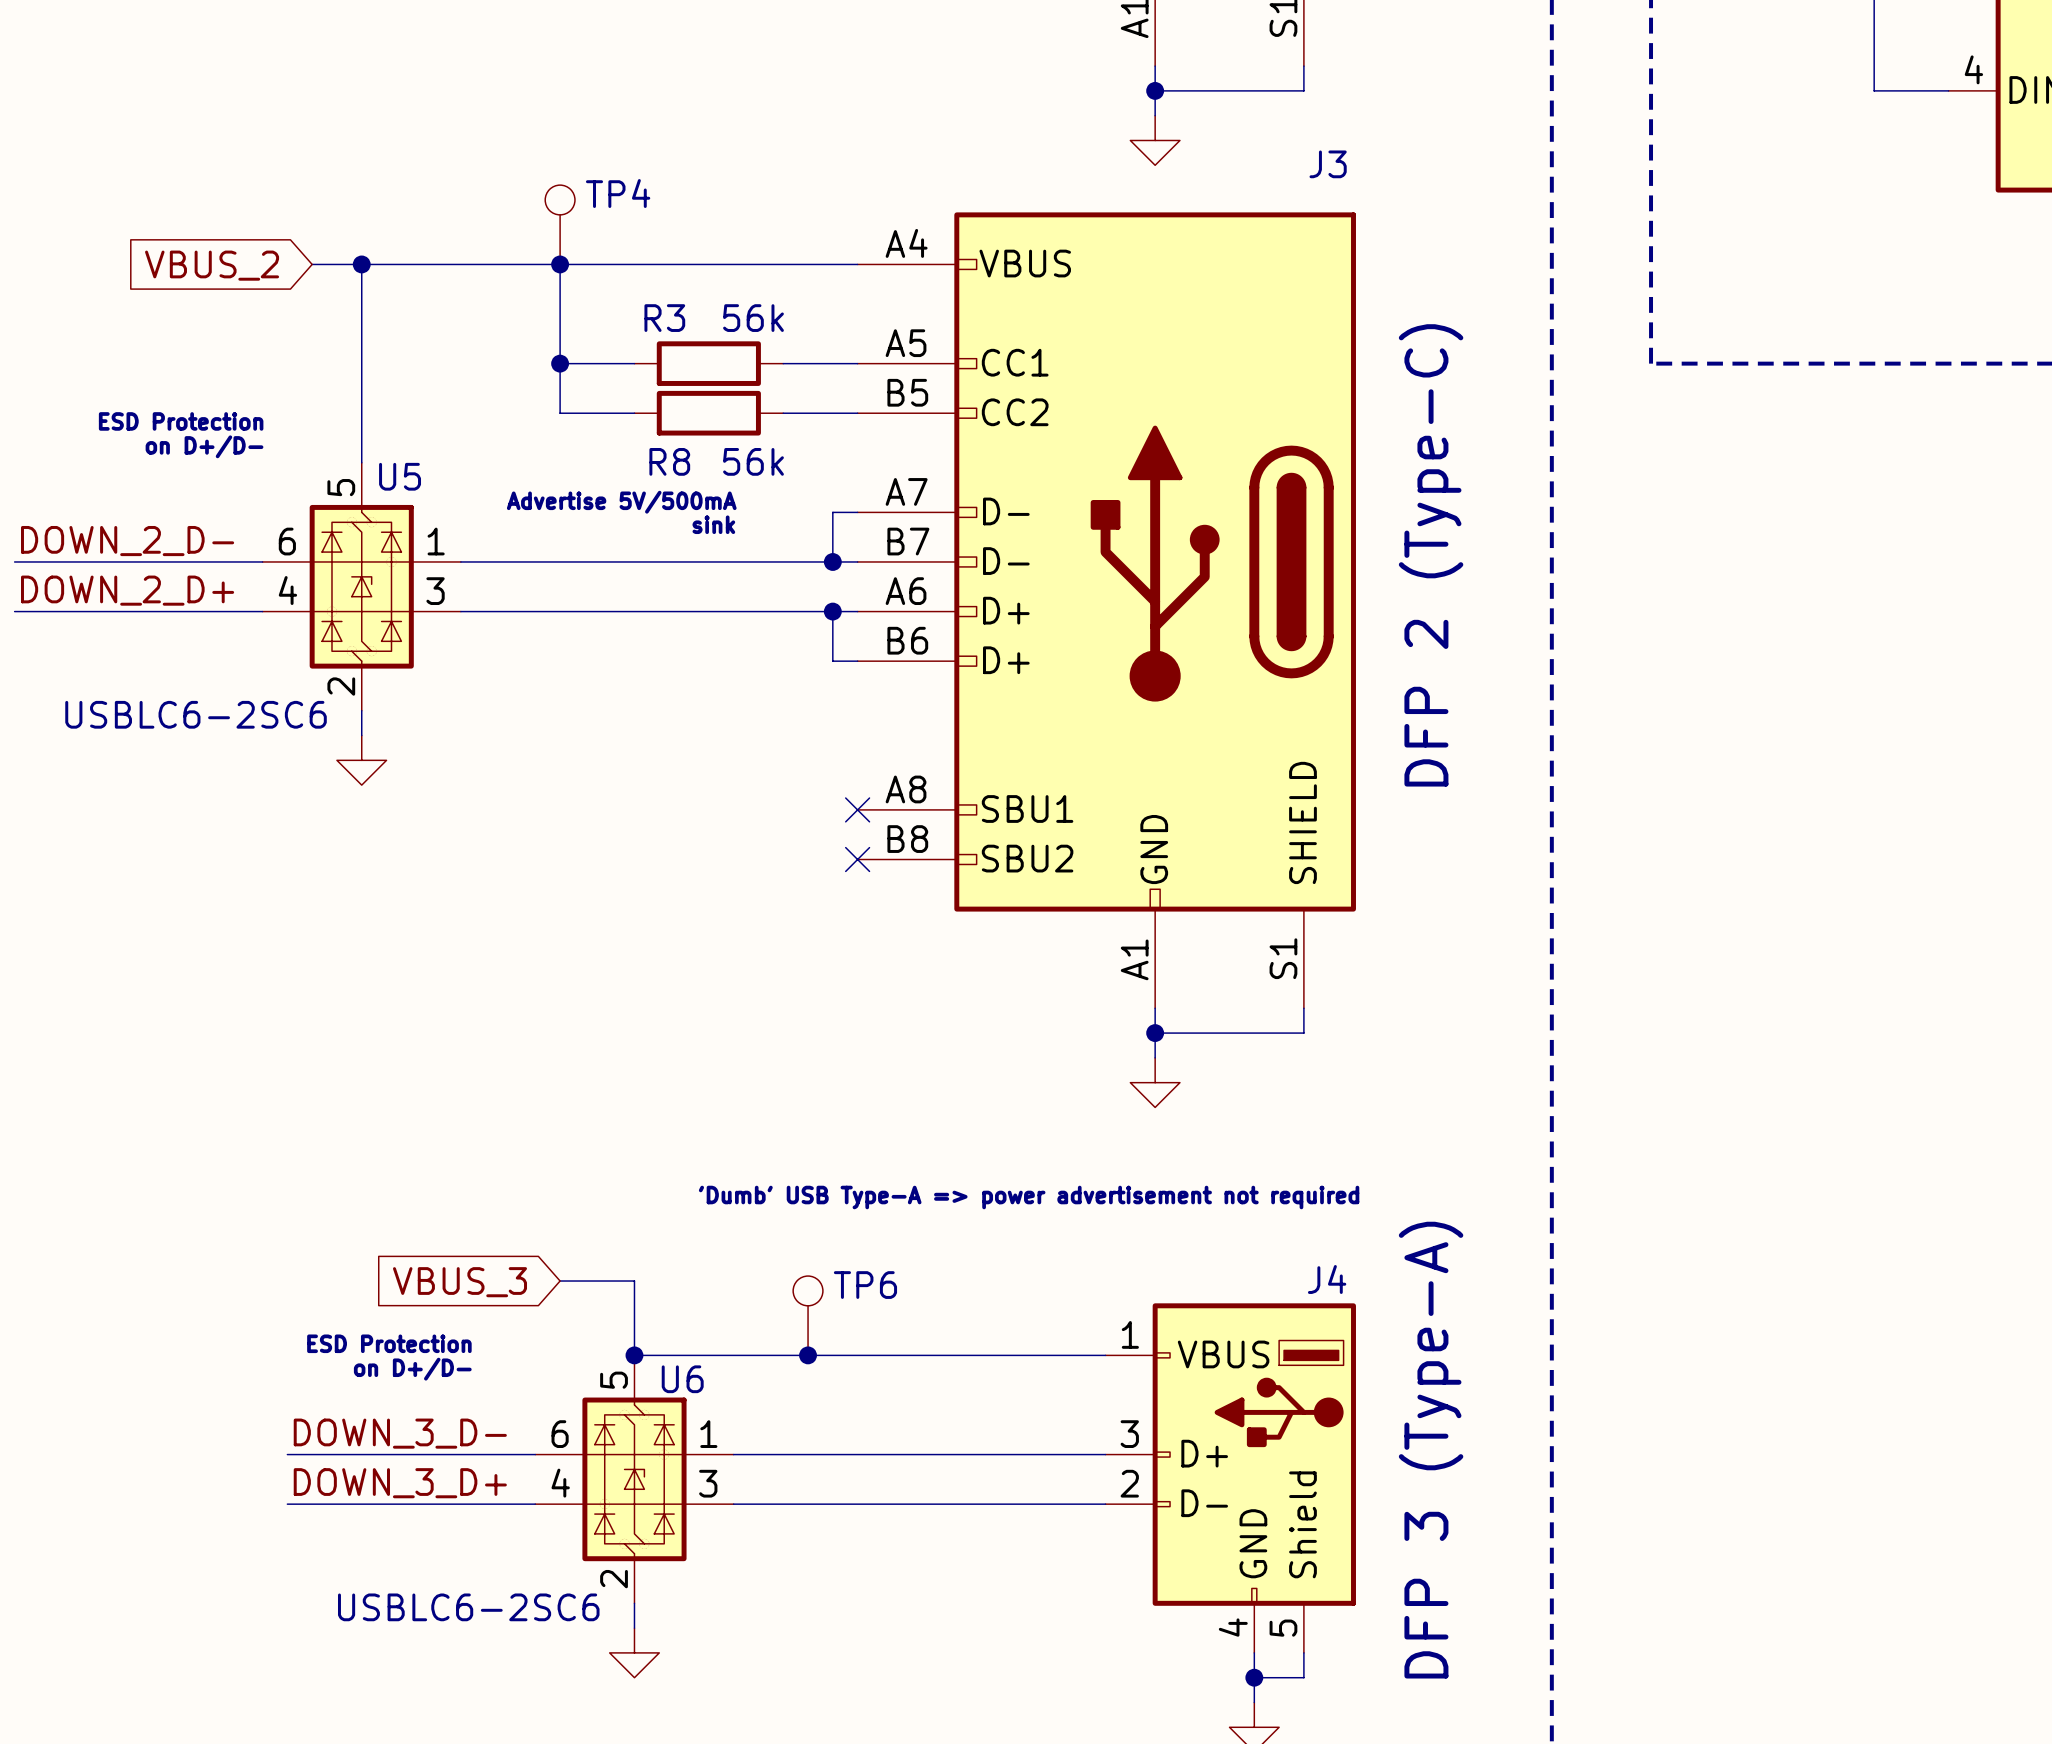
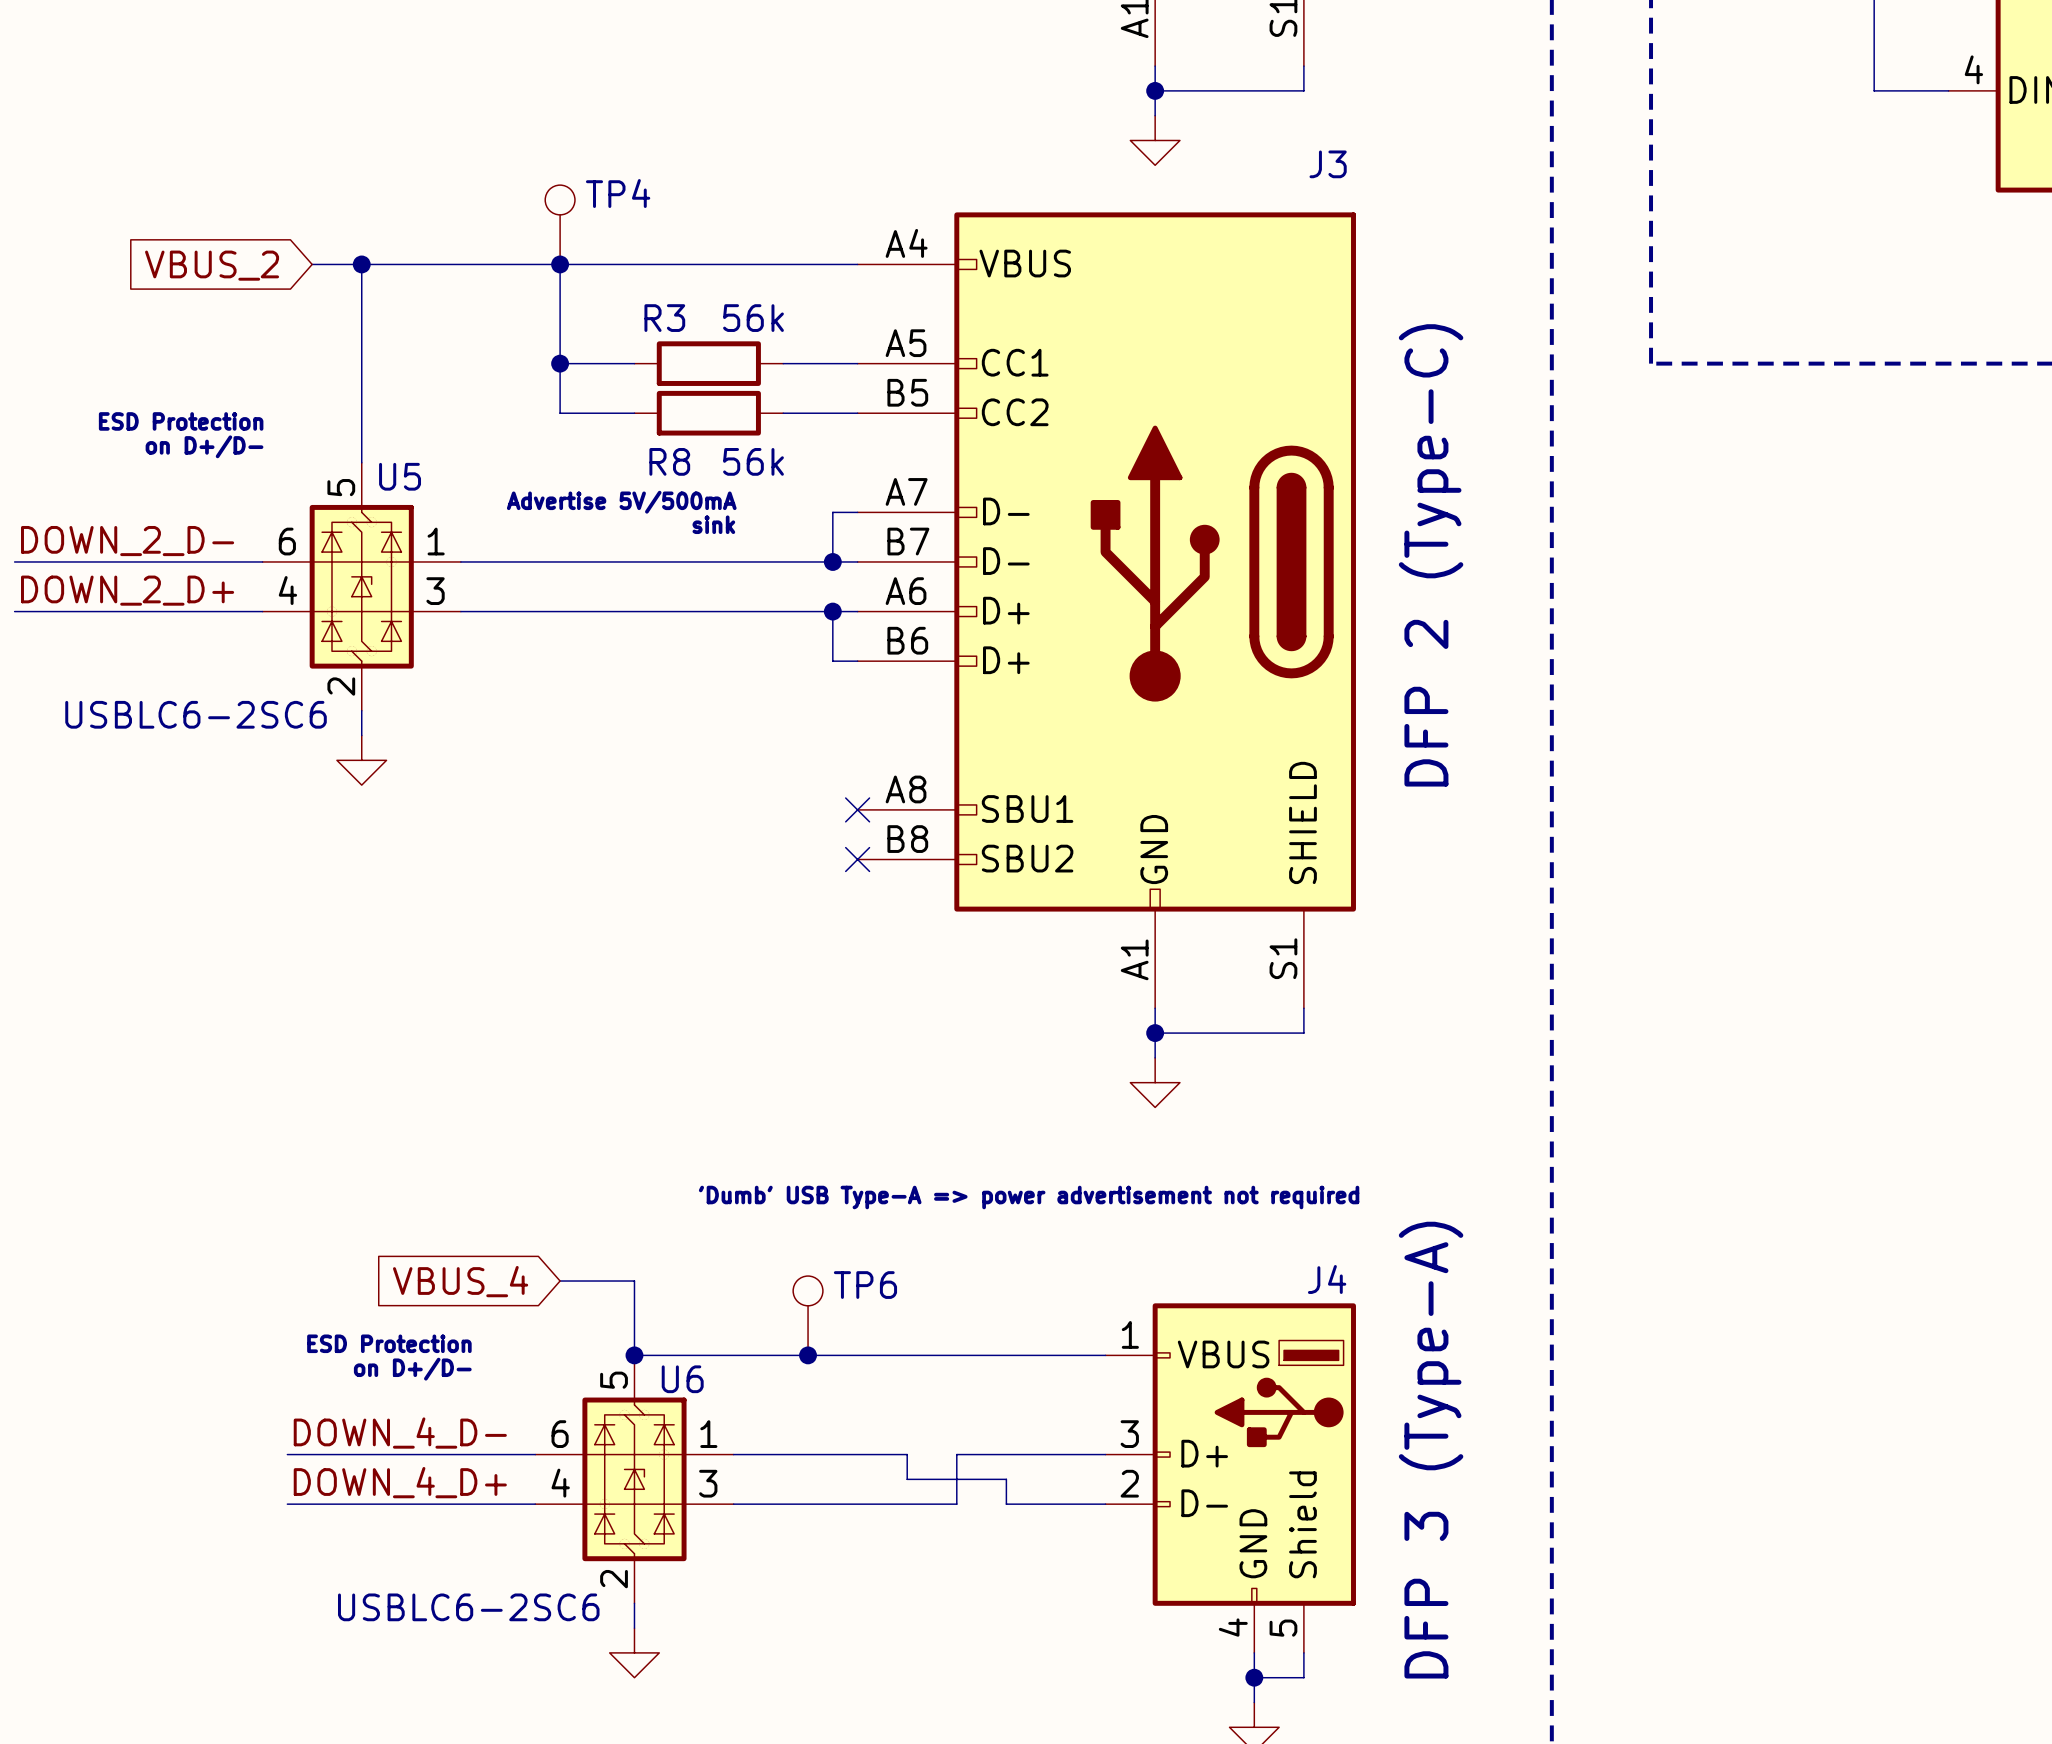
global label: VBUS_3 (459, 1282) -> VBUS_4 (460, 1281)
label: DOWN_3_D- (400, 1433) -> DOWN_4_D- (400, 1433)
wire: (907, 1454) (956, 1454) -> (907, 1454) (907, 1479) (1006, 1479) (1006, 1504)
label: DOWN_3_D+ (400, 1483) -> DOWN_4_D+ (400, 1482)
wire: (956, 1504) (1006, 1504) -> (956, 1504) (956, 1454)

